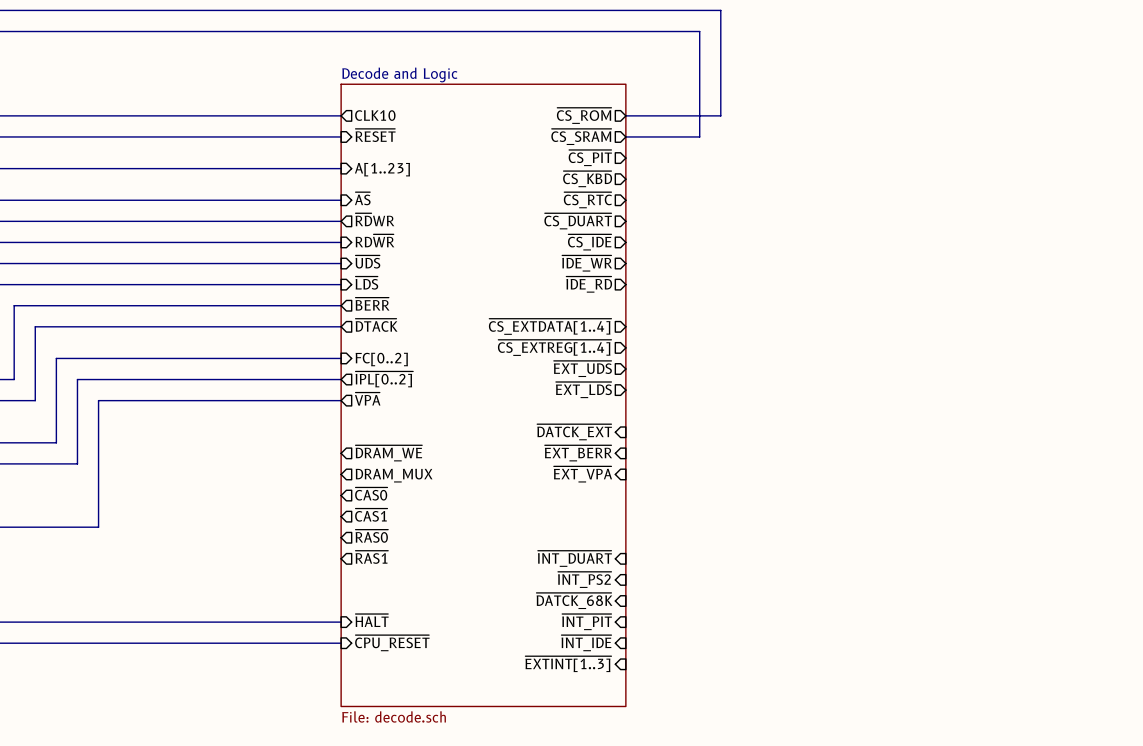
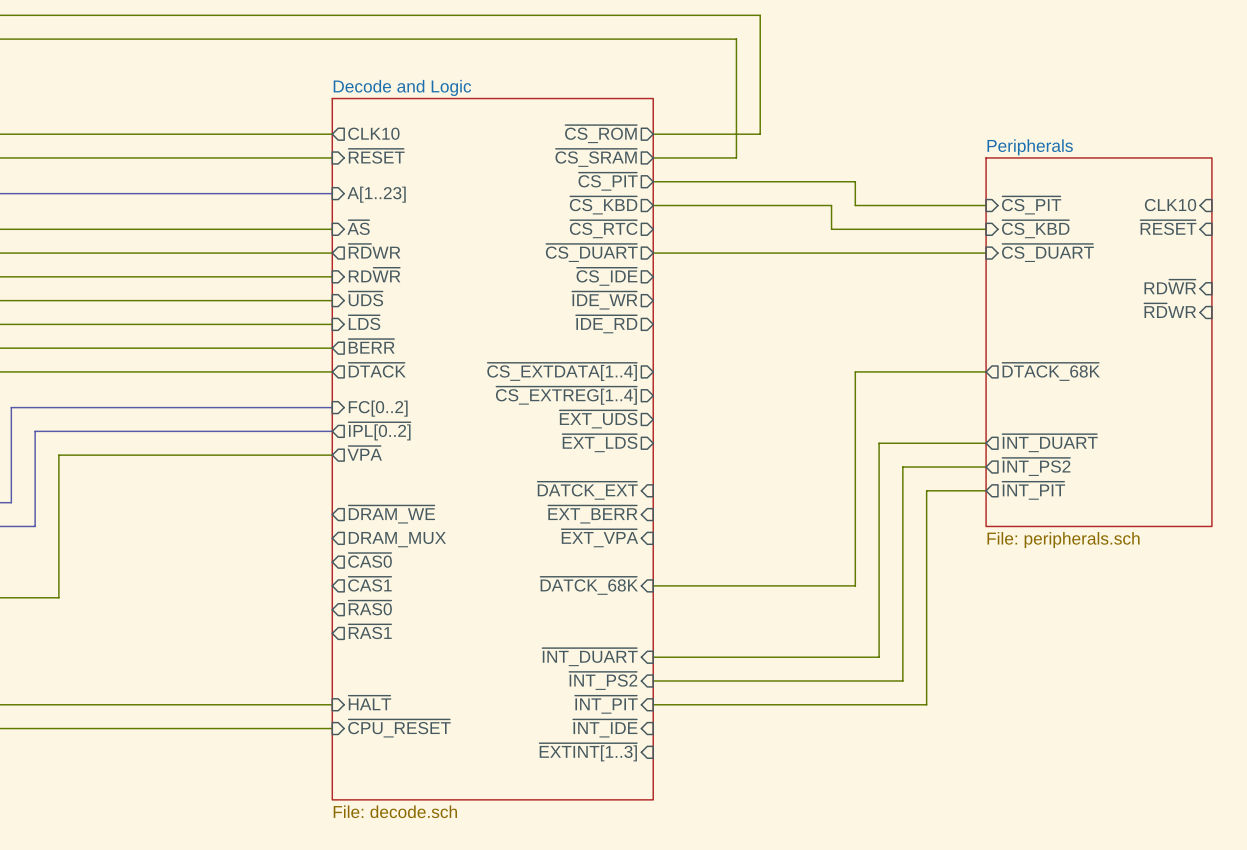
wire: none -> (653, 181) (855, 181) (855, 205) (986, 205)
sheet pin: none -> CLK10 (1170, 205)
wire: none -> (653, 205) (831, 205) (831, 229) (986, 229)
sheet pin: none -> ~{CS_PIT} (1031, 205)
sheet pin: none -> ~{RESET} (1168, 227)
sheet pin: none -> ~{CS_KBD} (1035, 229)
wire: none -> (653, 253) (986, 253)
sheet pin: none -> ~{CS_DUART} (1047, 252)
sheet pin: none -> RD~{WR} (1170, 286)
sheet pin: none -> ~{RD}WR (1170, 310)
sheet Peripherals: none -> File: peripherals.sch (1098, 342)
wire: none -> (986, 371) (855, 371) (855, 585) (653, 585)
sheet pin: none -> ~{DTACK_68K} (1051, 371)
wire: none -> (986, 443) (879, 443) (879, 657) (653, 657)
sheet pin: none -> ~{INT_DUART} (1050, 443)
wire: none -> (986, 467) (902, 467) (902, 680) (653, 680)
sheet pin: none -> ~{INT_PS2} (1036, 466)
wire: none -> (986, 490) (926, 490) (926, 704) (653, 704)
sheet pin: none -> ~{INT_PIT} (1033, 490)
sheet pin: none -> ~{DATCK_68K} (589, 585)
sheet pin: ~{INT_DUART} (574, 558) -> none
sheet pin: ~{INT_PS2} (584, 579) -> ~{INT_DUART} (590, 657)
sheet pin: ~{DATCK_68K} (574, 600) -> ~{INT_PS2} (603, 680)

